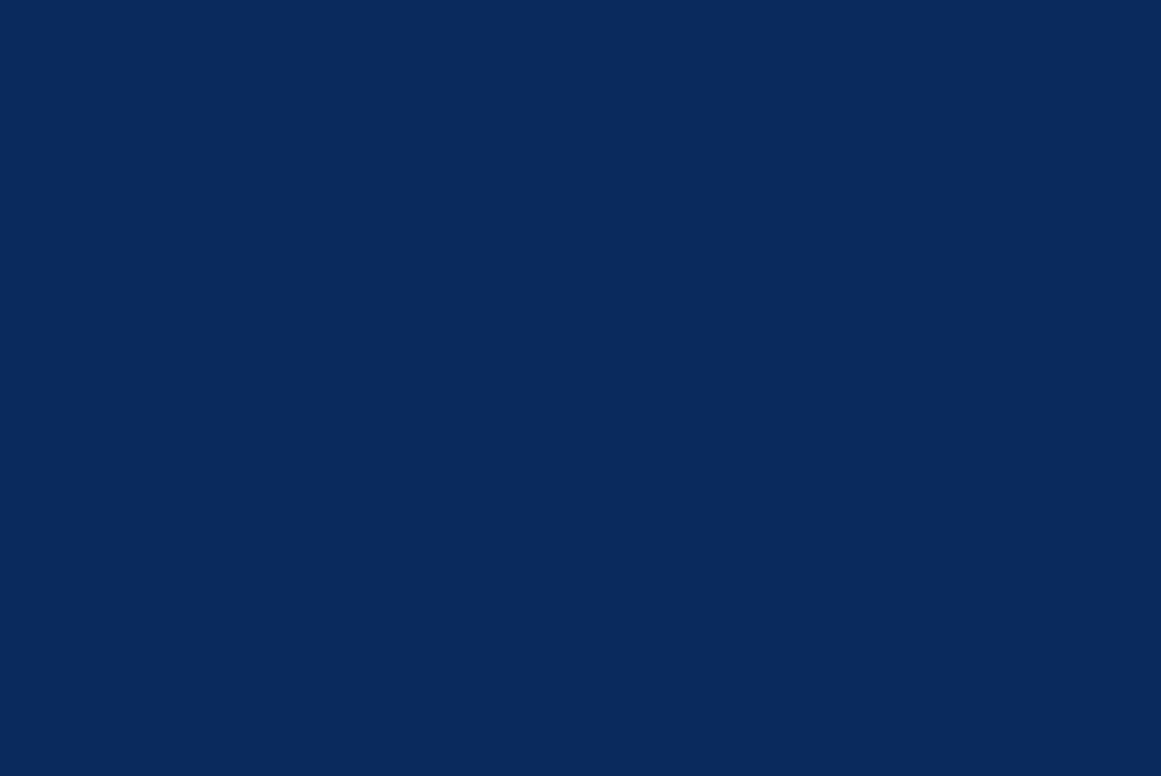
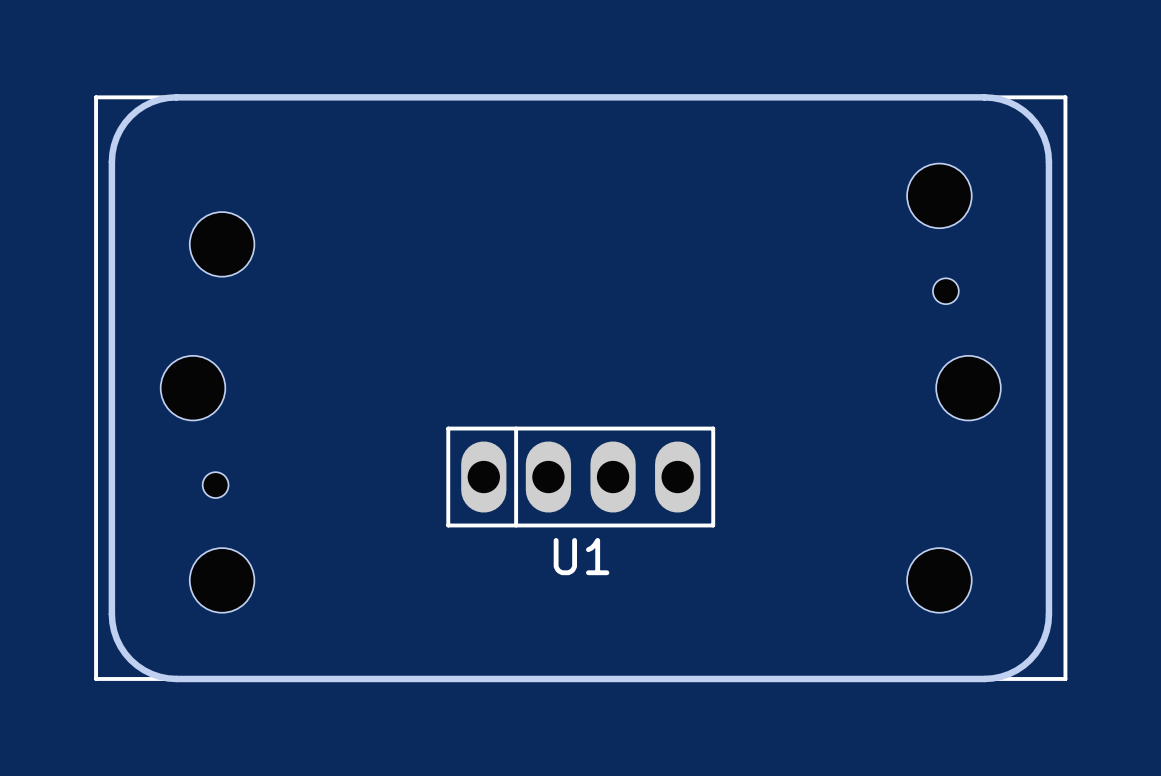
board edge: none -> (984, 97) (176, 97) (159, 99) (144, 106) (130, 116) (120, 129) (114, 145) (111, 161) (111, 614) (114, 631) (120, 646) (130, 660) (144, 670) (159, 676) (176, 678) (984, 678) (1001, 676) (1016, 670) (1030, 660) (1040, 646) (1046, 631) (1048, 614) (1048, 161) (1044, 137) (1030, 116) (1009, 102) (984, 97)
U1: none -> (580, 388)

